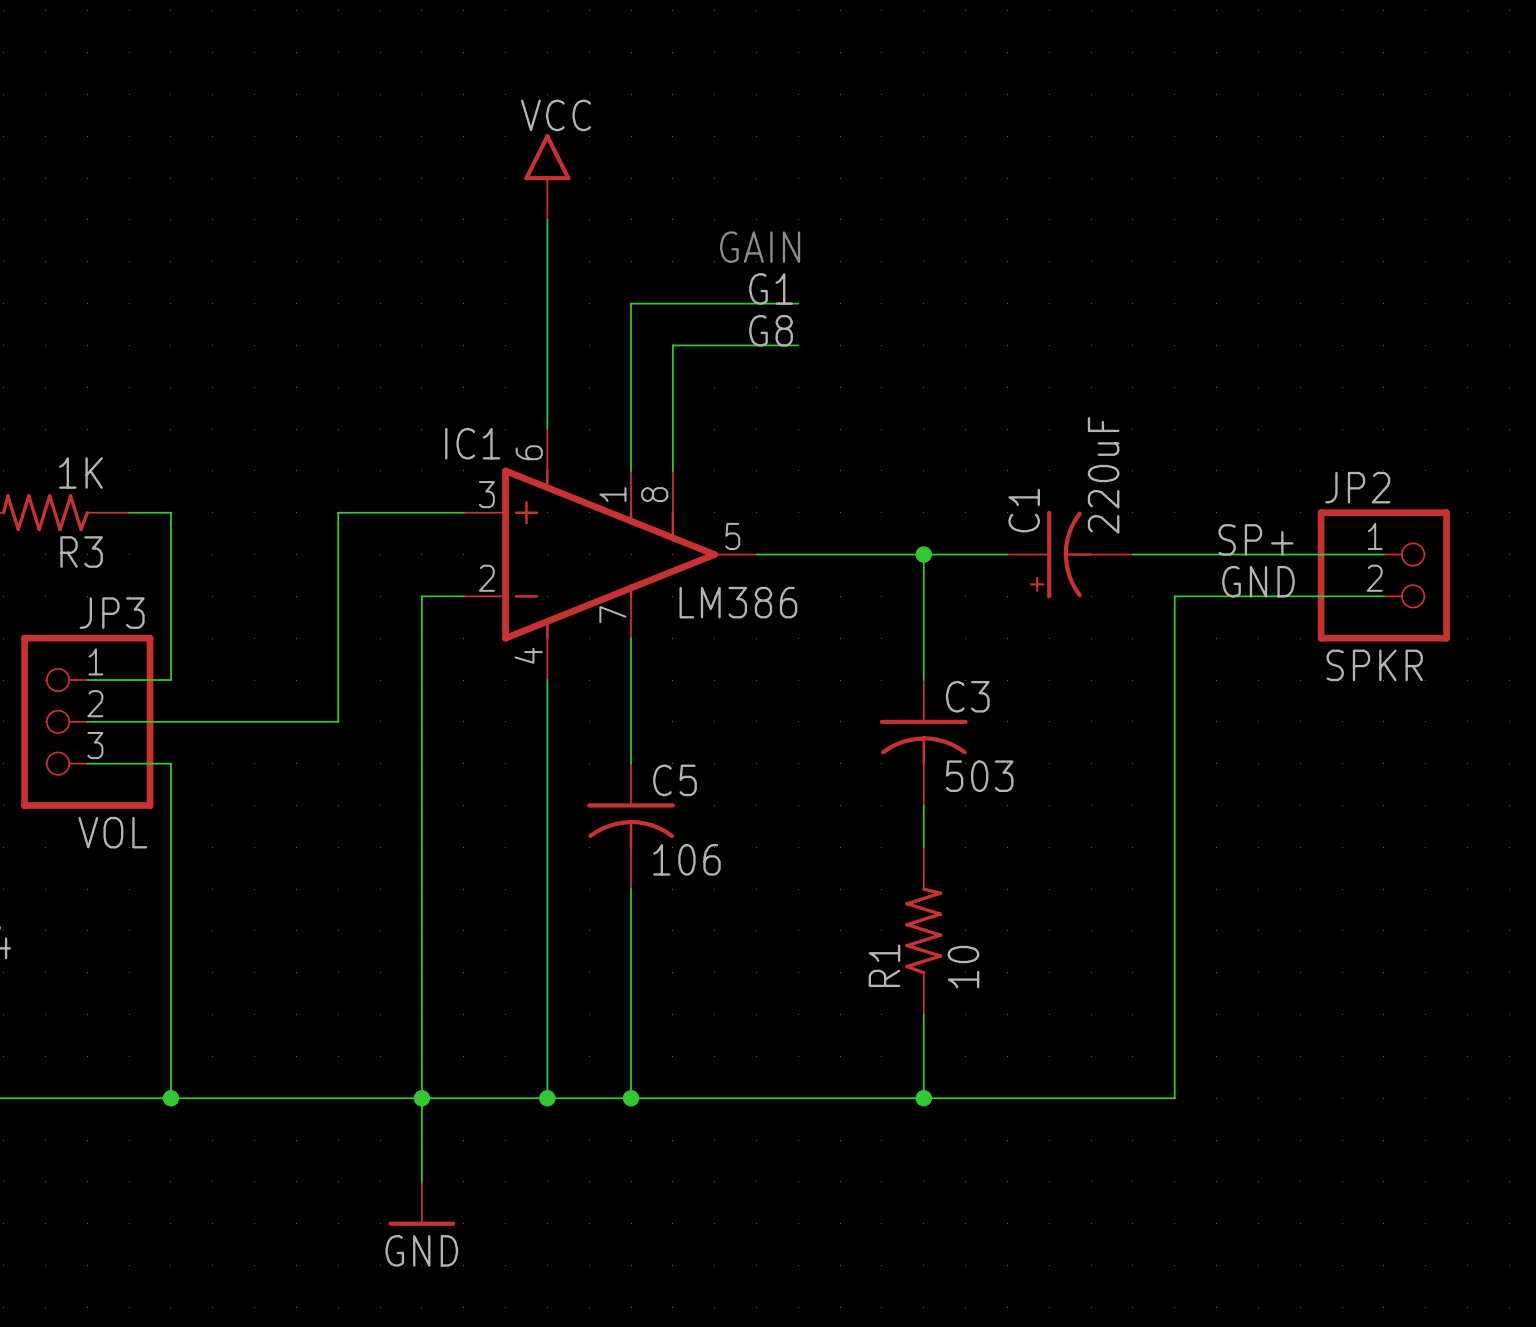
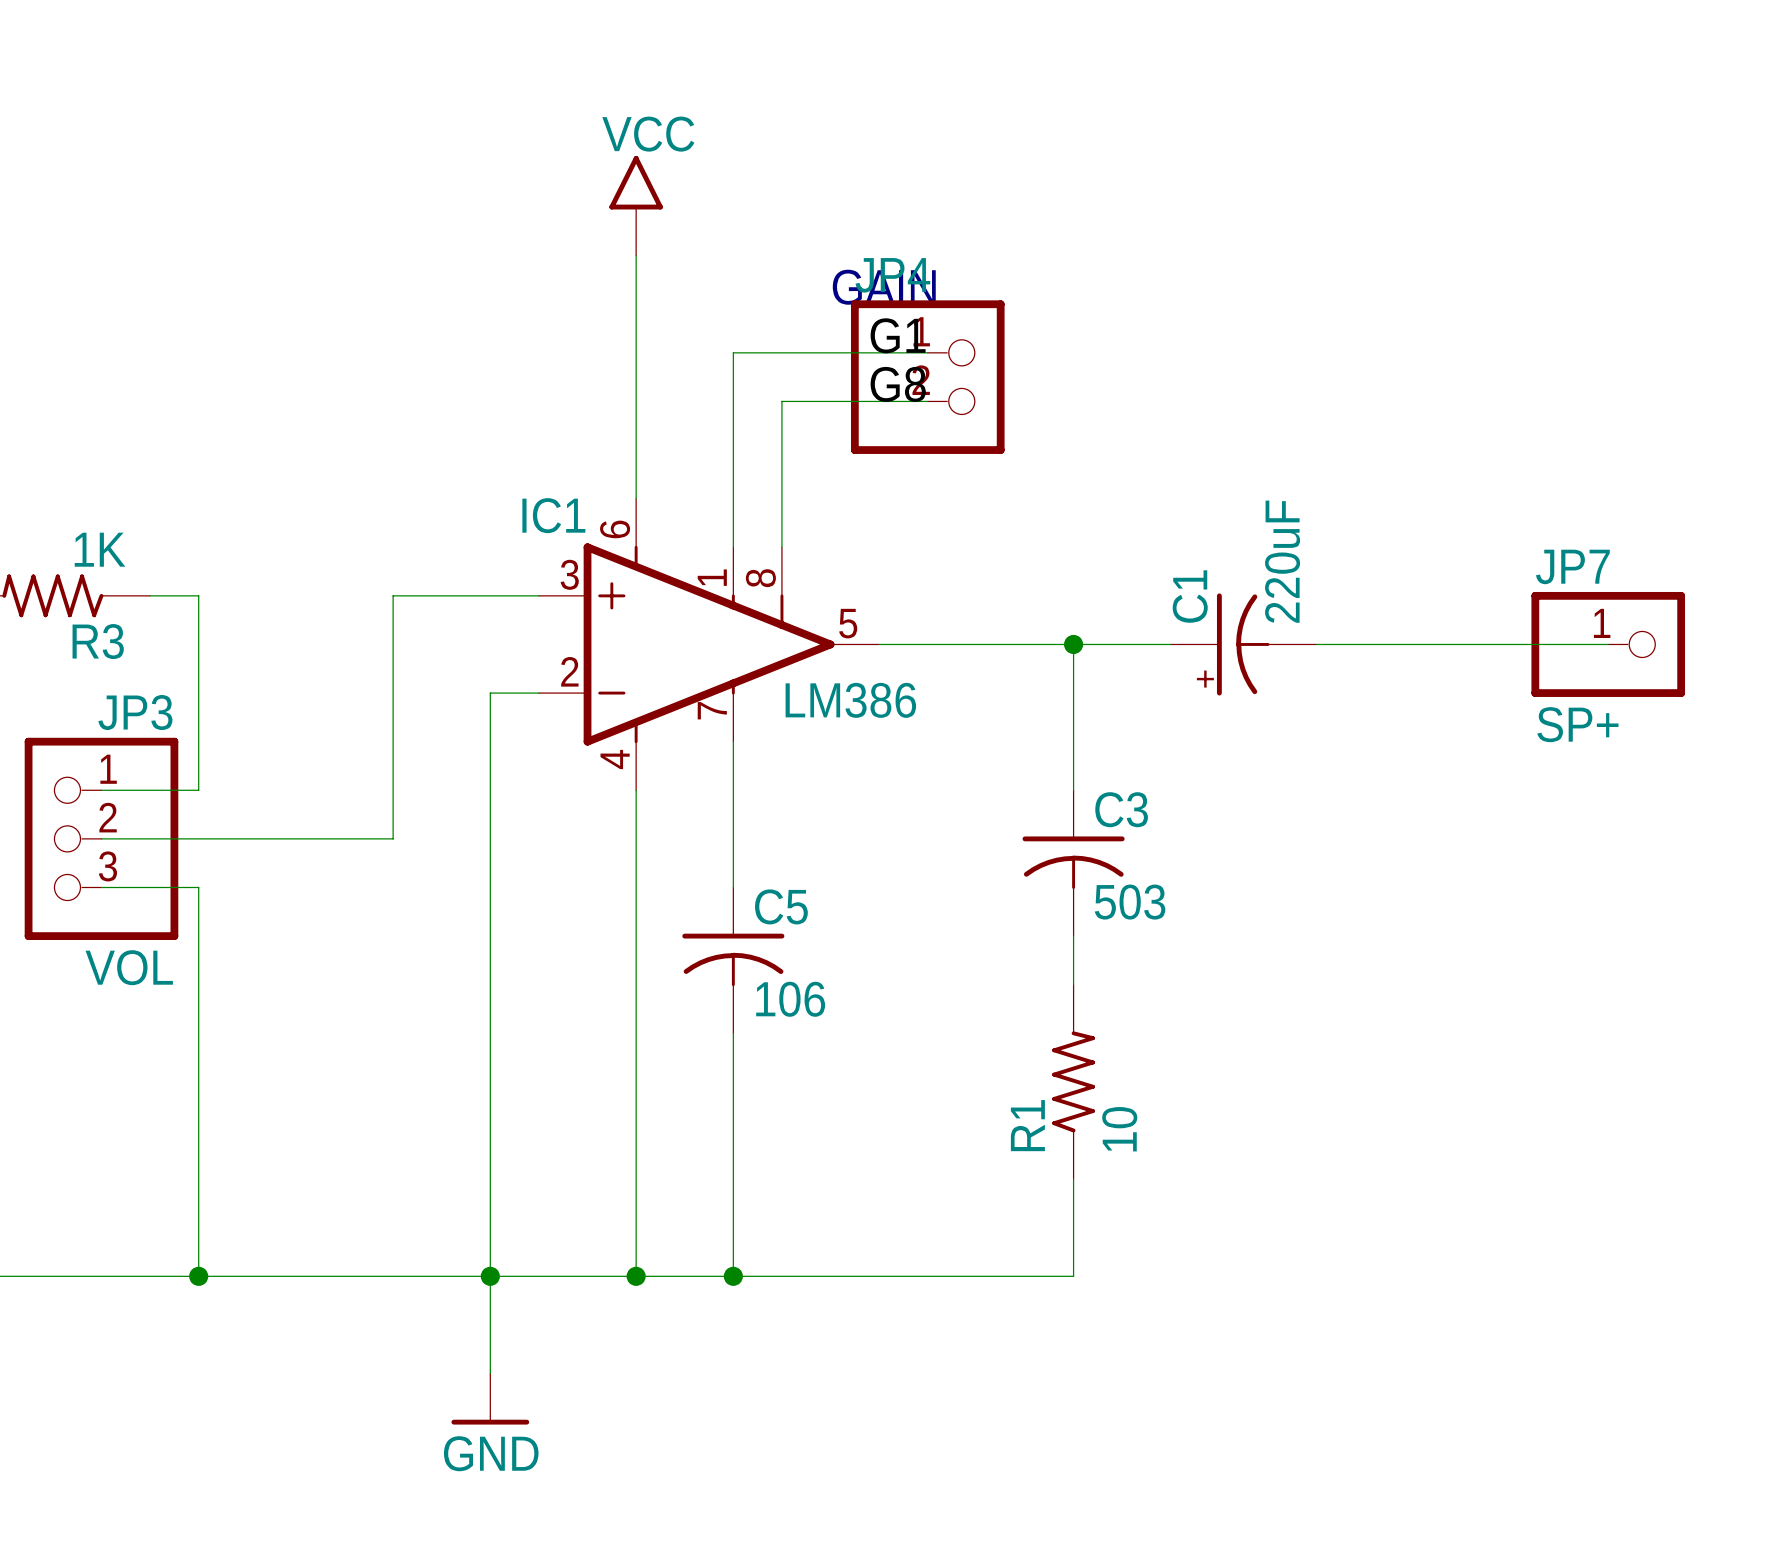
JP4: none -> (927, 377)
label: SP+ (1255, 539) -> none
JP7: none -> SP+ (1608, 644)
JP2: SPKR (1383, 575) -> none
label: GND (1258, 581) -> none
wire: (1383, 596) (1174, 596) (1174, 1098) (923, 1098) -> none
junction: (923, 1098) -> none

